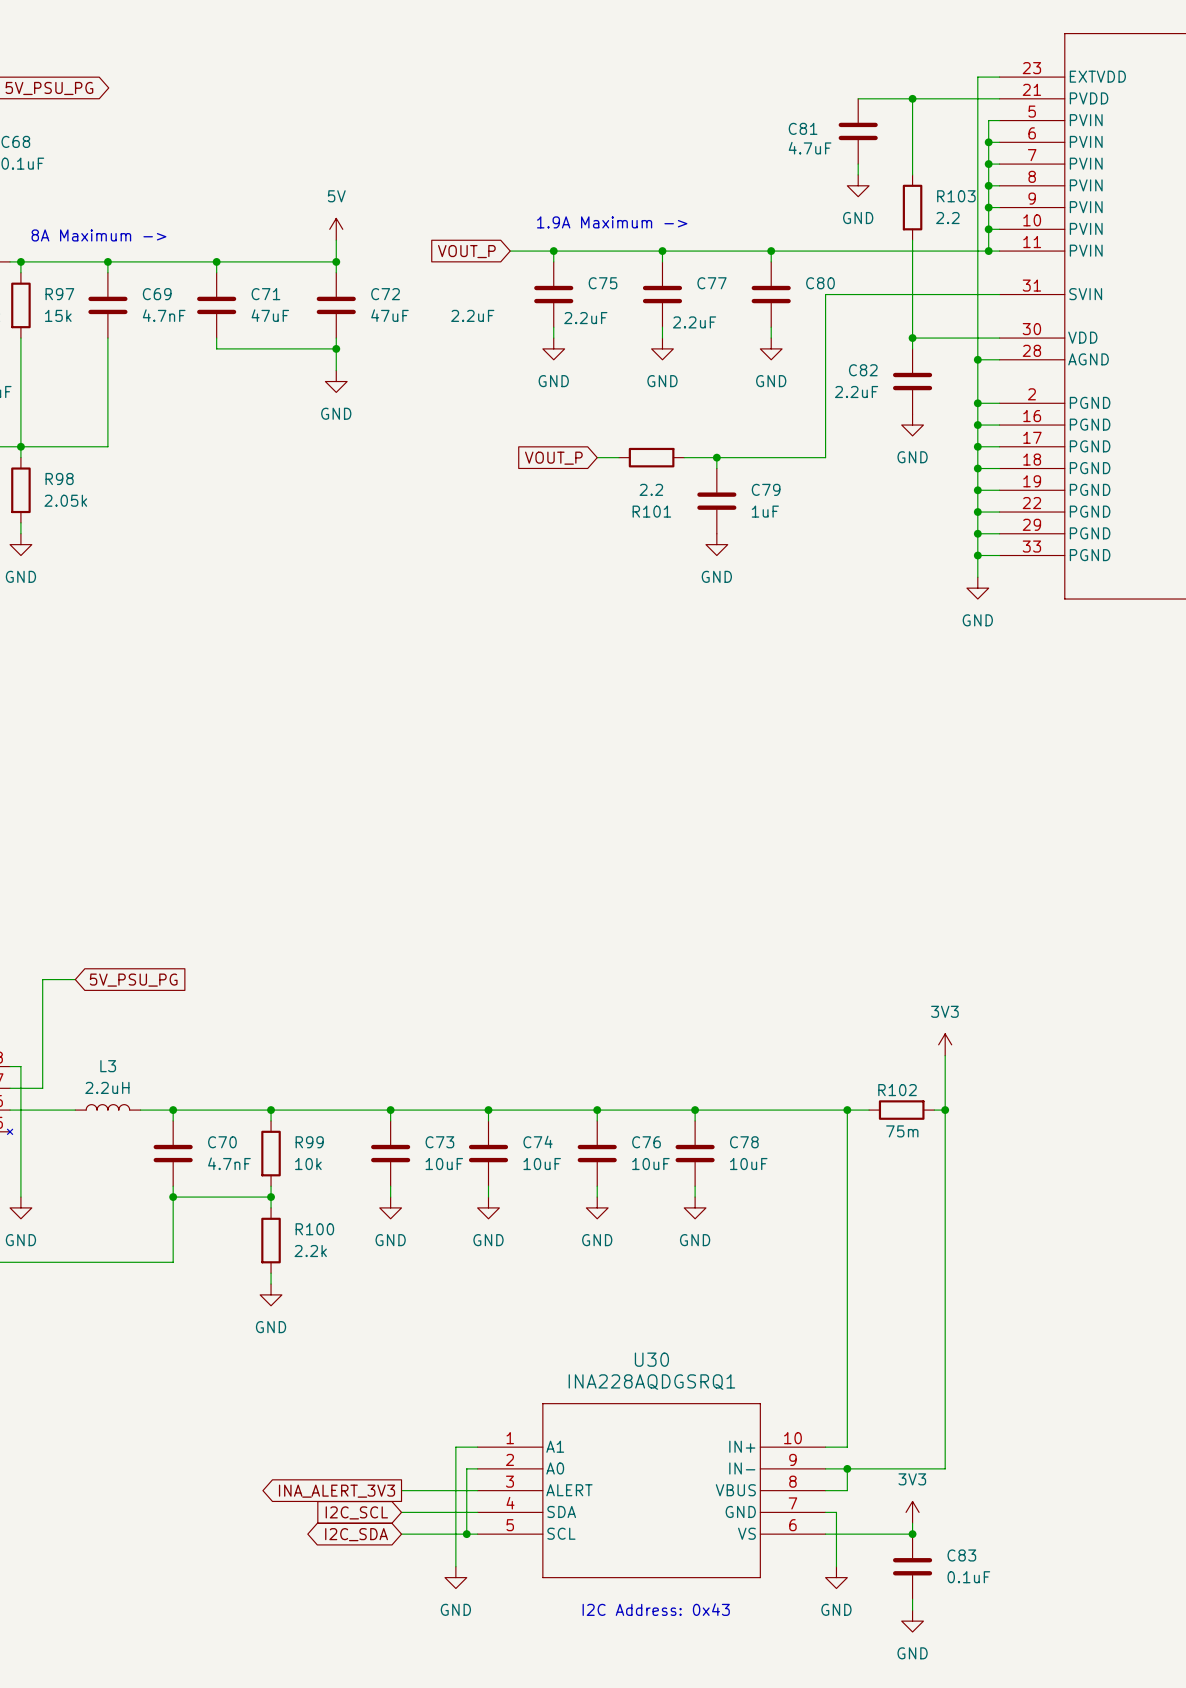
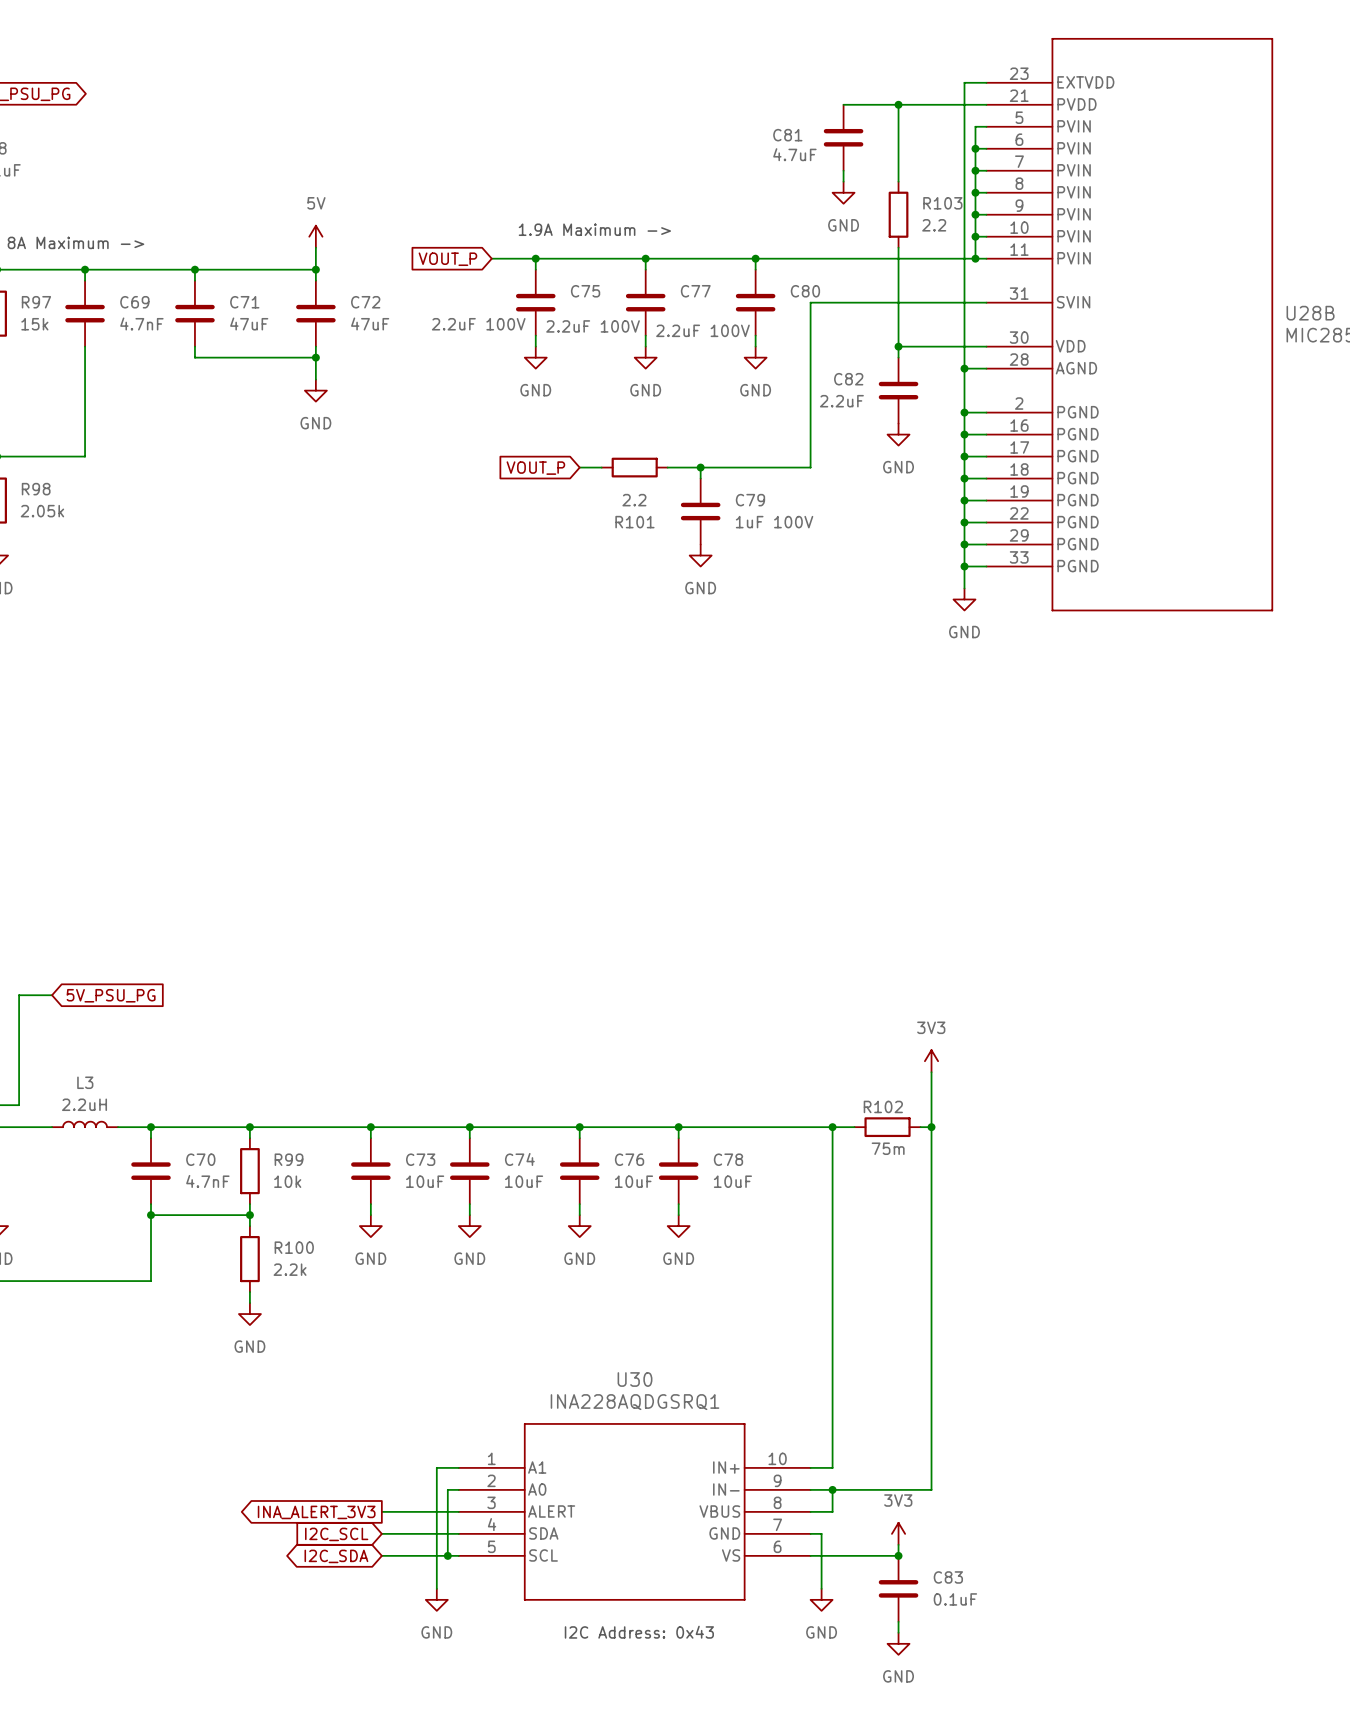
C75 value: 2.2uF (472, 315) -> 2.2uF 100V (478, 324)
C77 value: 2.2uF (585, 318) -> 2.2uF 100V (593, 326)
C80 value: 2.2uF (694, 322) -> 2.2uF 100V (702, 330)
C79 value: 1uF (765, 511) -> 1uF 100V (774, 522)

